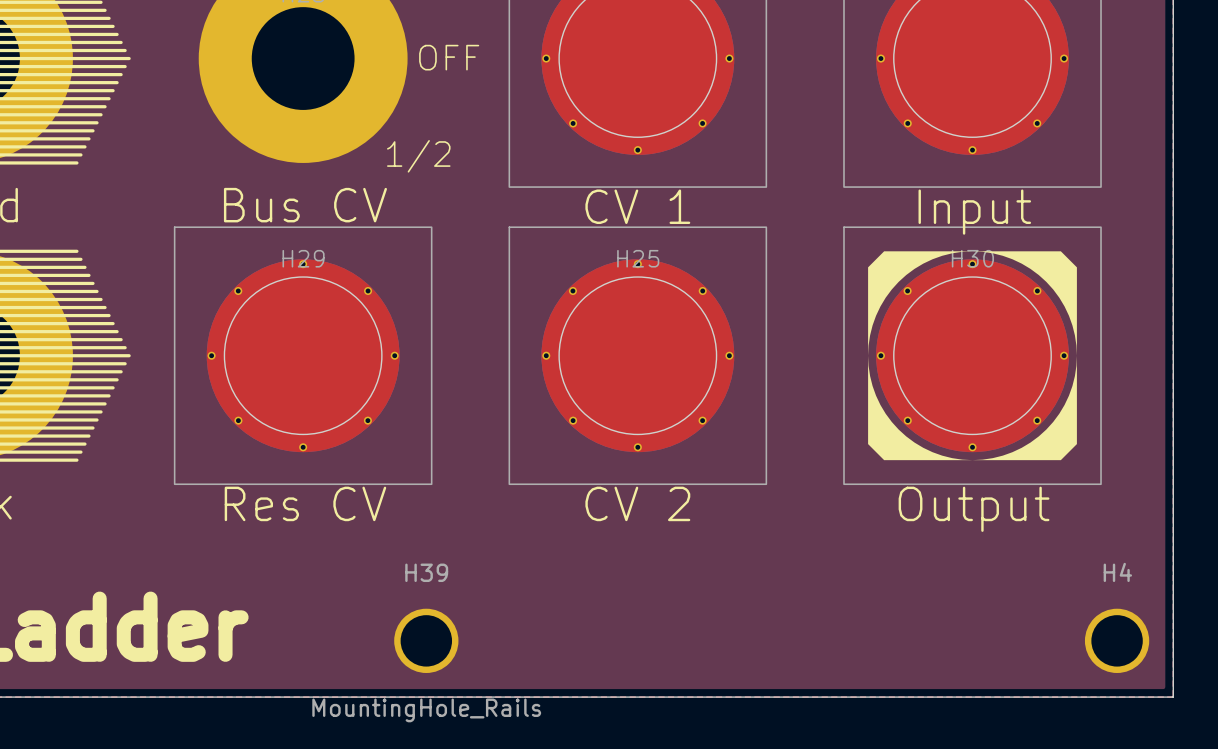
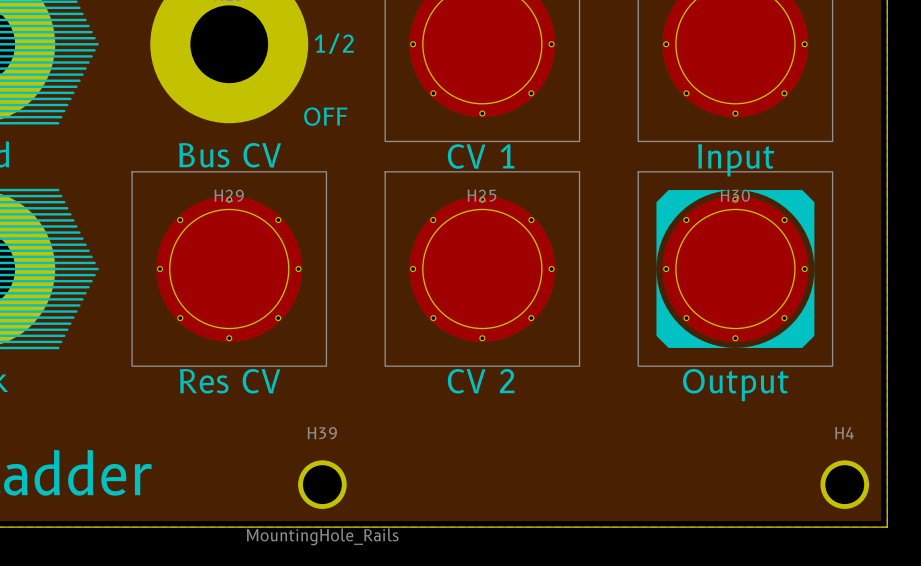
text position: OFF (449, 57) -> OFF (325, 116)
text position: 1/2 (418, 156) -> 1/2 (334, 43)

